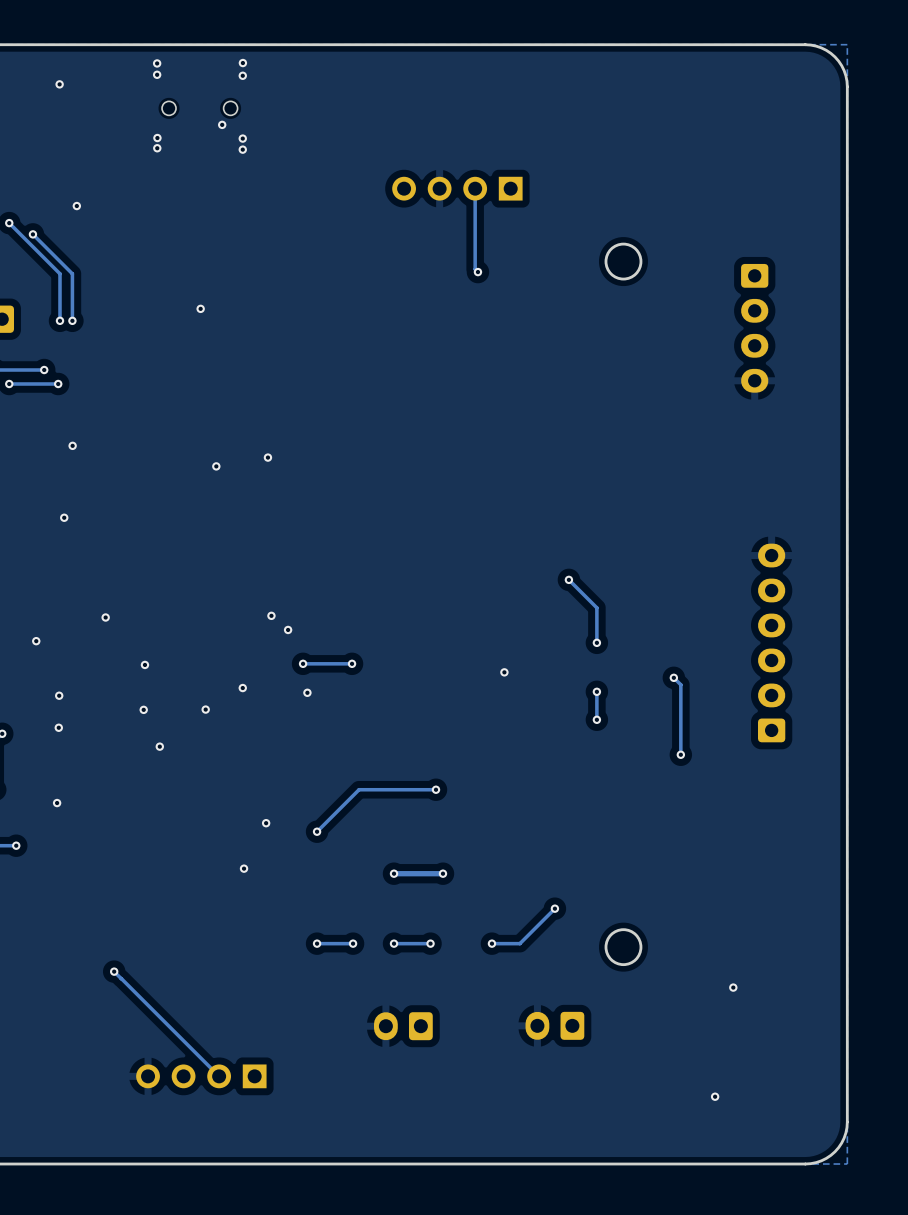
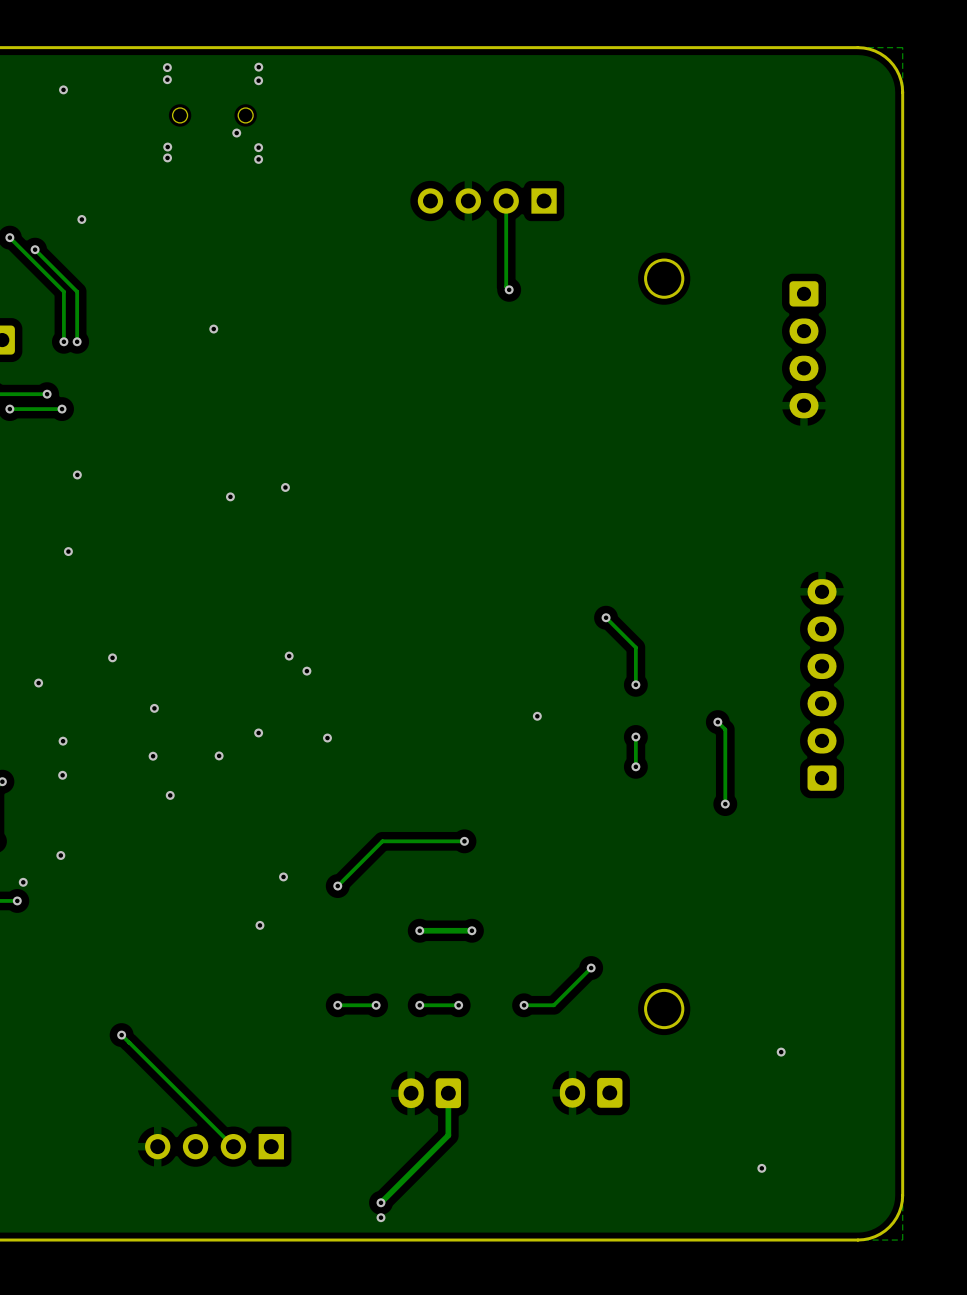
via: (303, 663) -> none
track: (352, 663) (303, 663) -> none
via: (352, 663) -> none
via: none -> (23, 882)
track: none -> (448, 1093) (448, 1135) (380, 1202)
via: none -> (380, 1202)
via: none -> (380, 1217)

